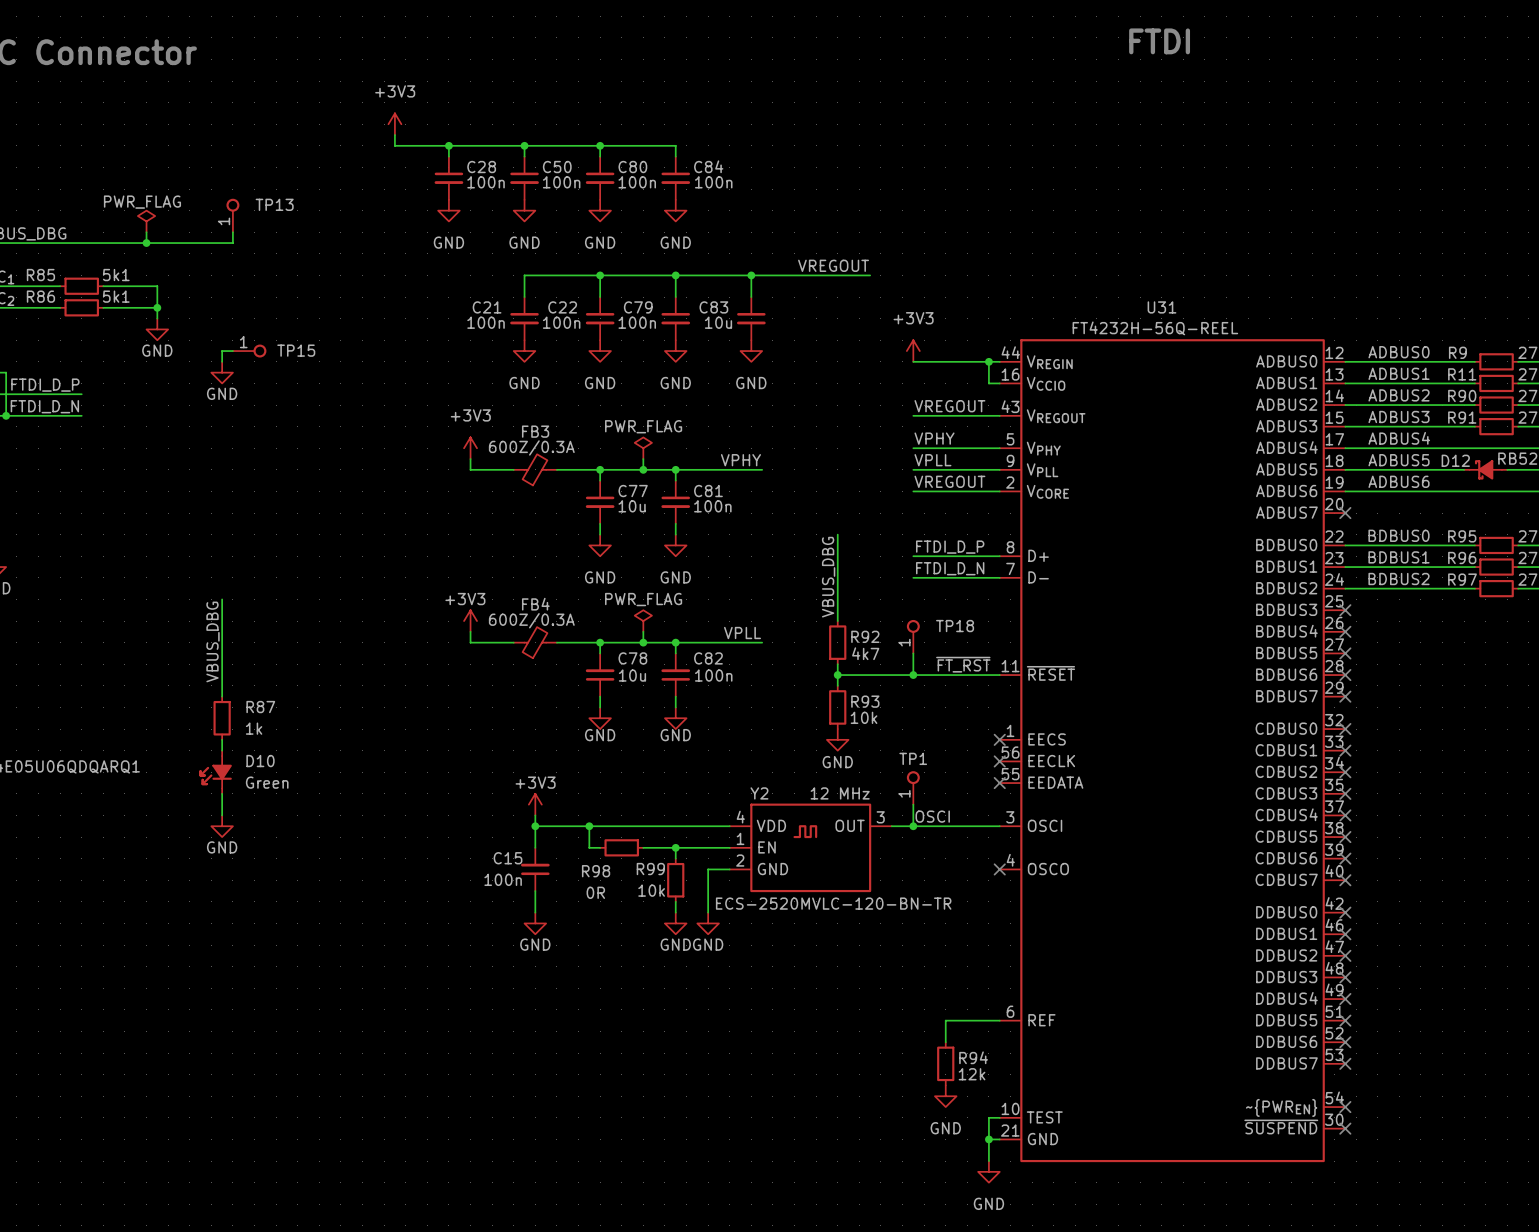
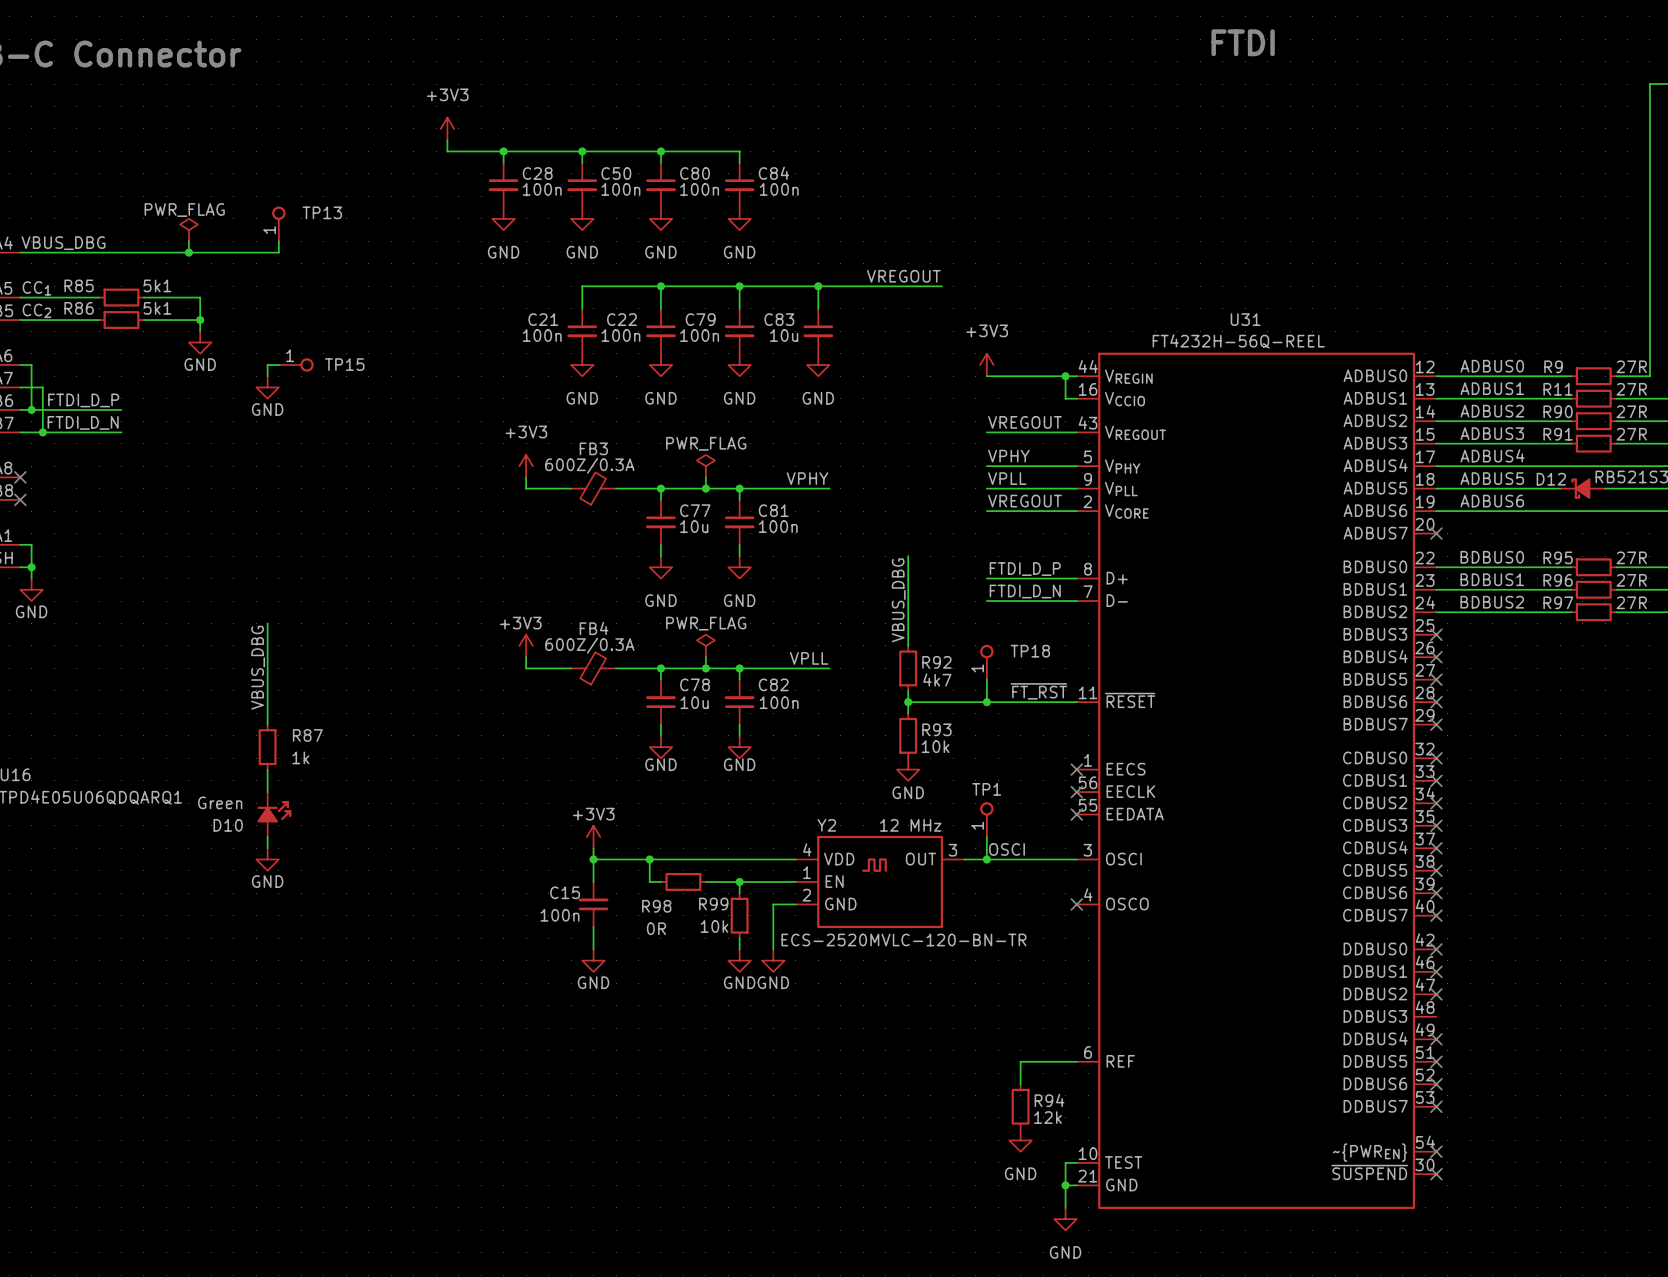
D10 rotation: 0° (215, 772) -> 180° (274, 814)
no-connect mark: (1345, 977) -> none

